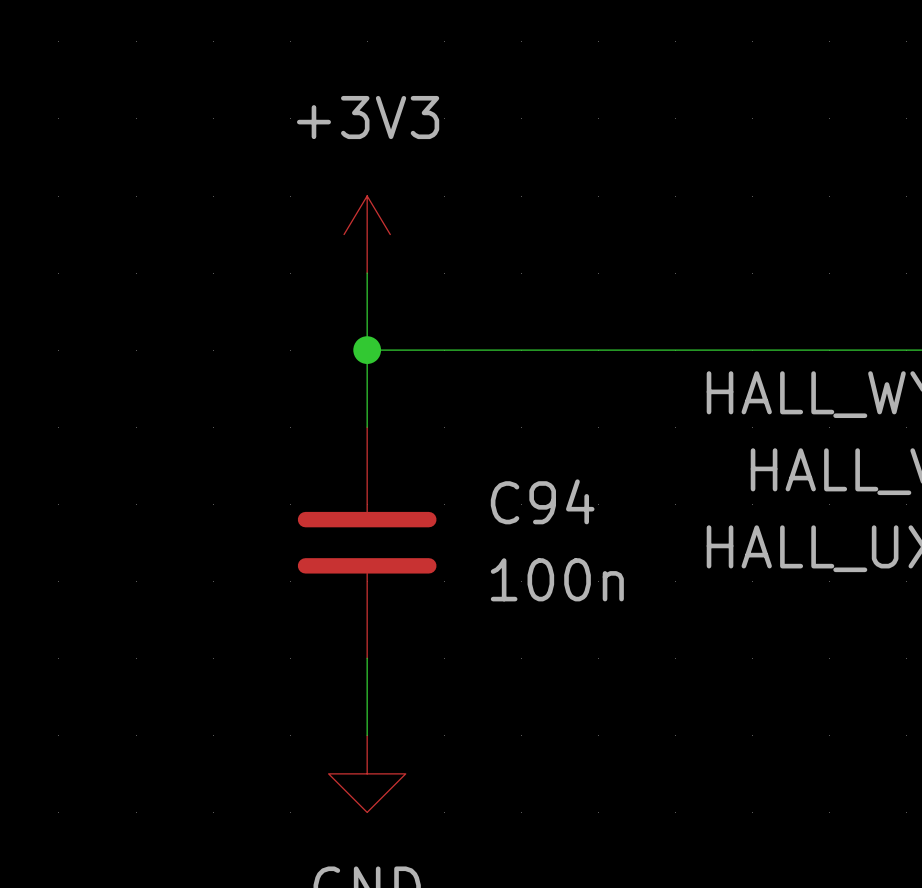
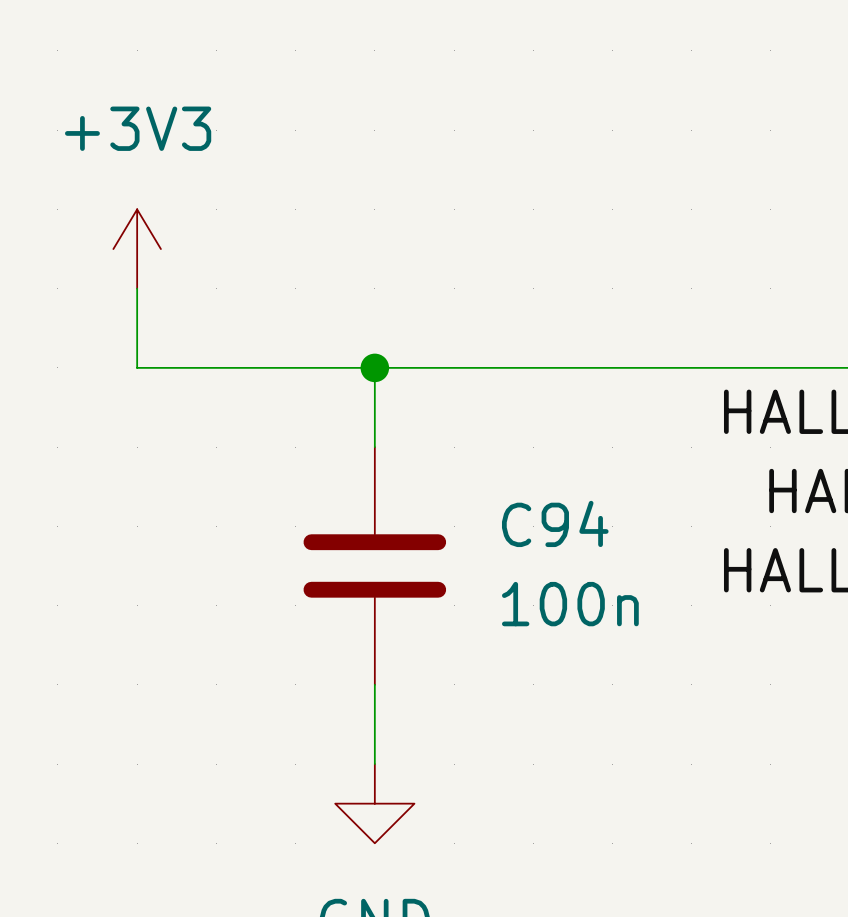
power symbol position: +3V3 (367, 234) -> +3V3 (137, 249)
wire: (367, 273) (367, 350) -> (137, 288) (137, 367) (374, 367)

